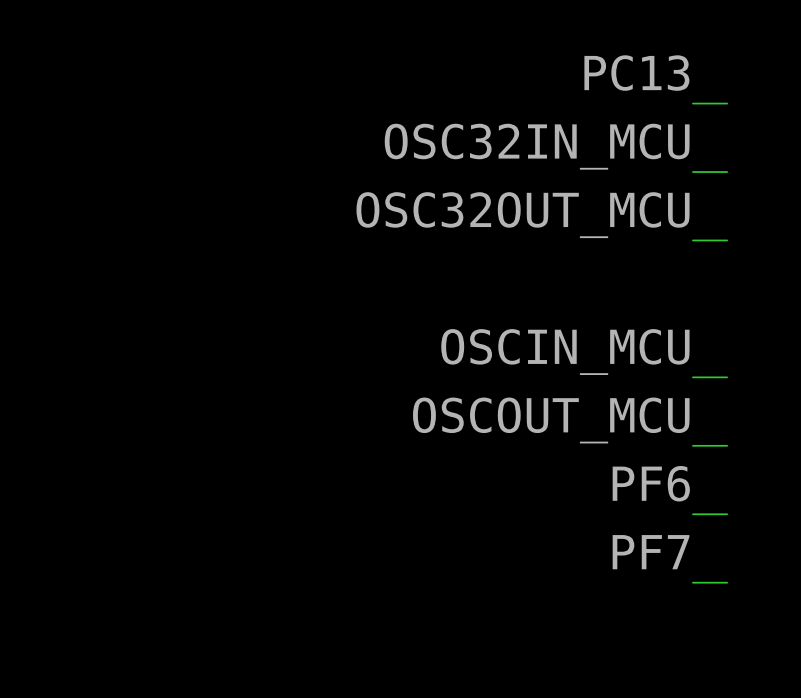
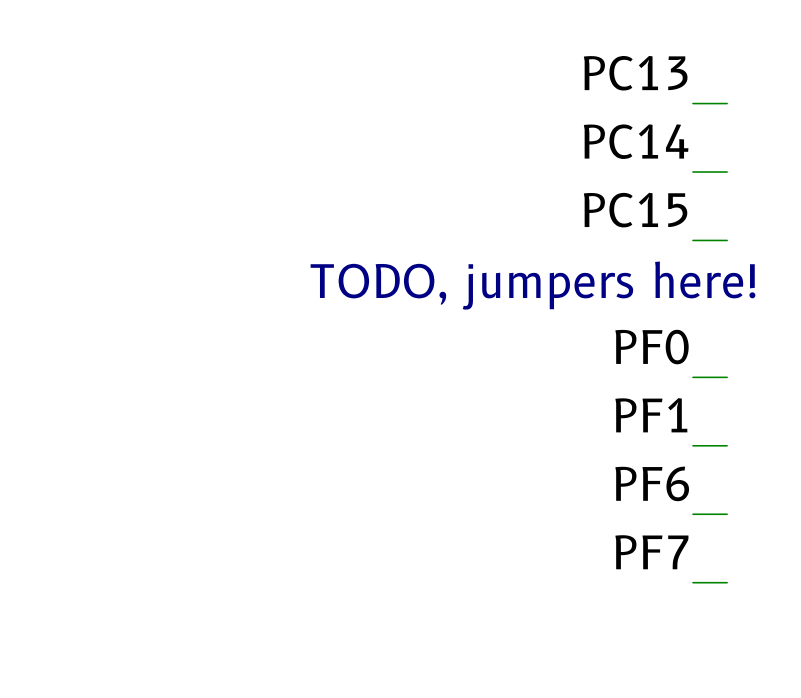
label: OSC32IN_MCU (537, 146) -> PC14 (636, 141)
label: OSC32OUT_MCU (523, 215) -> PC15 (635, 210)
text: none -> TODO, jumpers here! (532, 285)
label: OSCIN_MCU (565, 352) -> PF0 (652, 347)
label: OSCOUT_MCU (551, 420) -> PF1 (651, 415)

